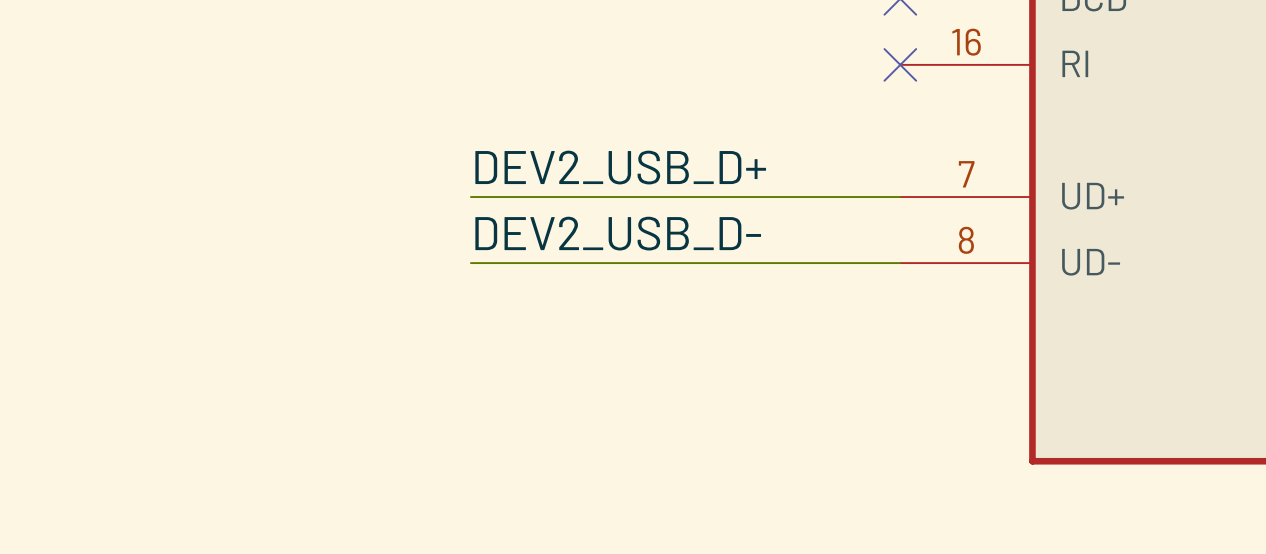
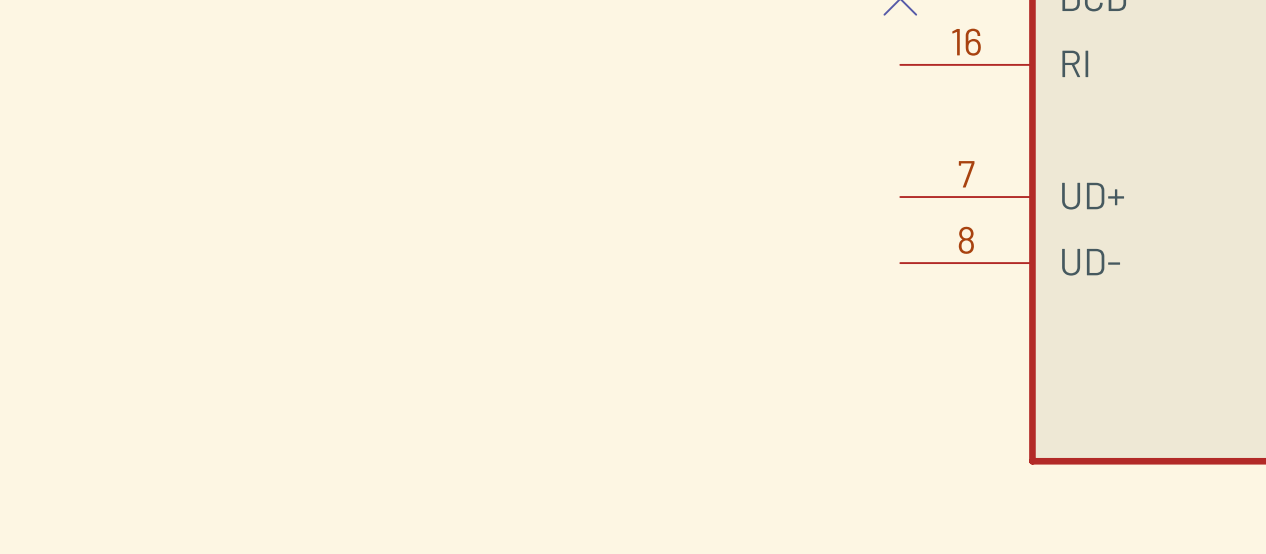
no-connect mark: (900, 64) -> none
label: DEV2_USB_D+ (620, 167) -> none
wire: (470, 197) (900, 197) -> none
label: DEV2_USB_D- (618, 233) -> none
wire: (470, 263) (900, 263) -> none

